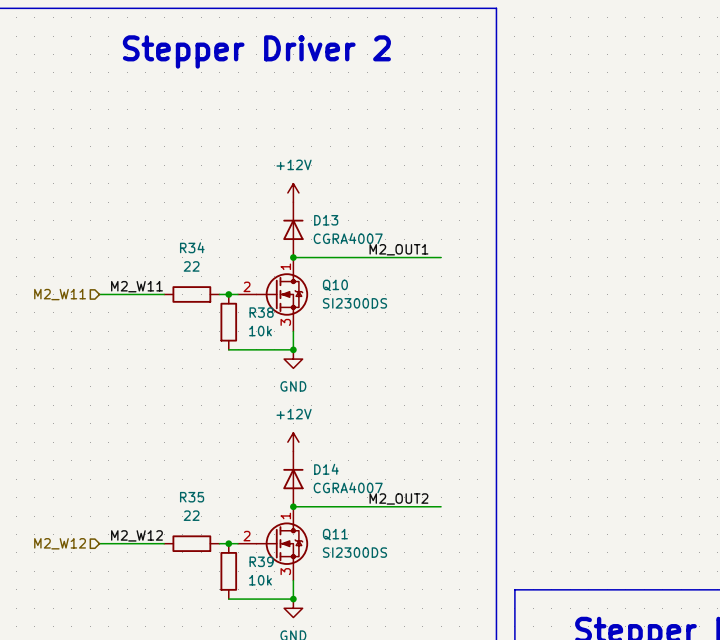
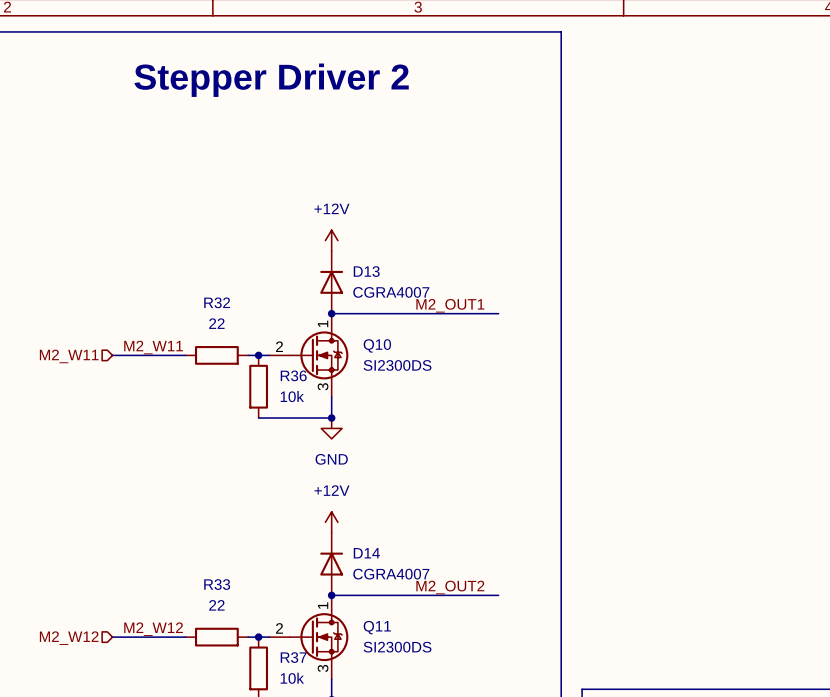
R34 name: R34 (192, 247) -> R32 (217, 302)
R38 name: R38 (261, 312) -> R36 (293, 375)
R35 name: R35 (192, 497) -> R33 (217, 584)
R39 name: R39 (261, 561) -> R37 (293, 657)

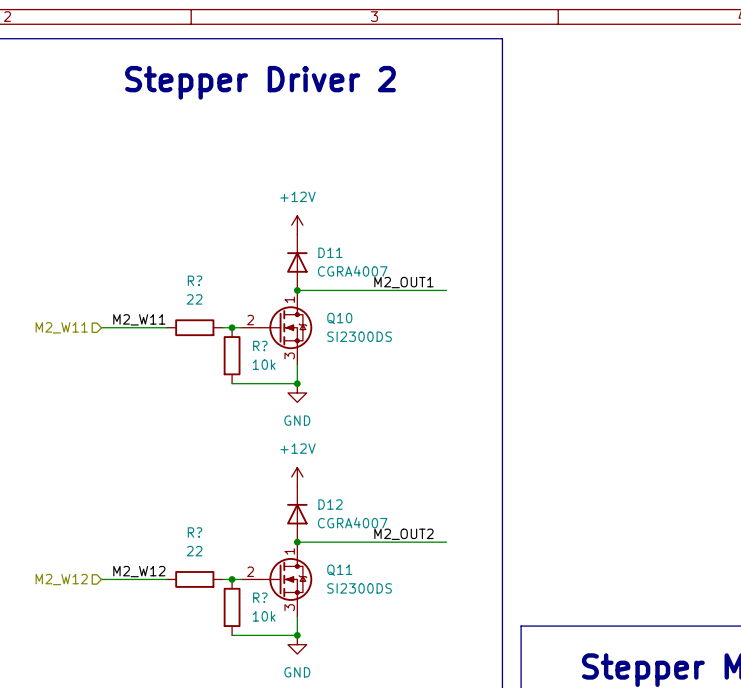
D13 name: D13 (366, 271) -> D11 (330, 252)
R32 name: R32 (217, 302) -> R? (195, 280)
R36 name: R36 (293, 375) -> R? (260, 346)
D14 name: D14 (366, 553) -> D12 (330, 504)
R33 name: R33 (217, 584) -> R? (195, 532)
R37 name: R37 (293, 657) -> R? (260, 597)

